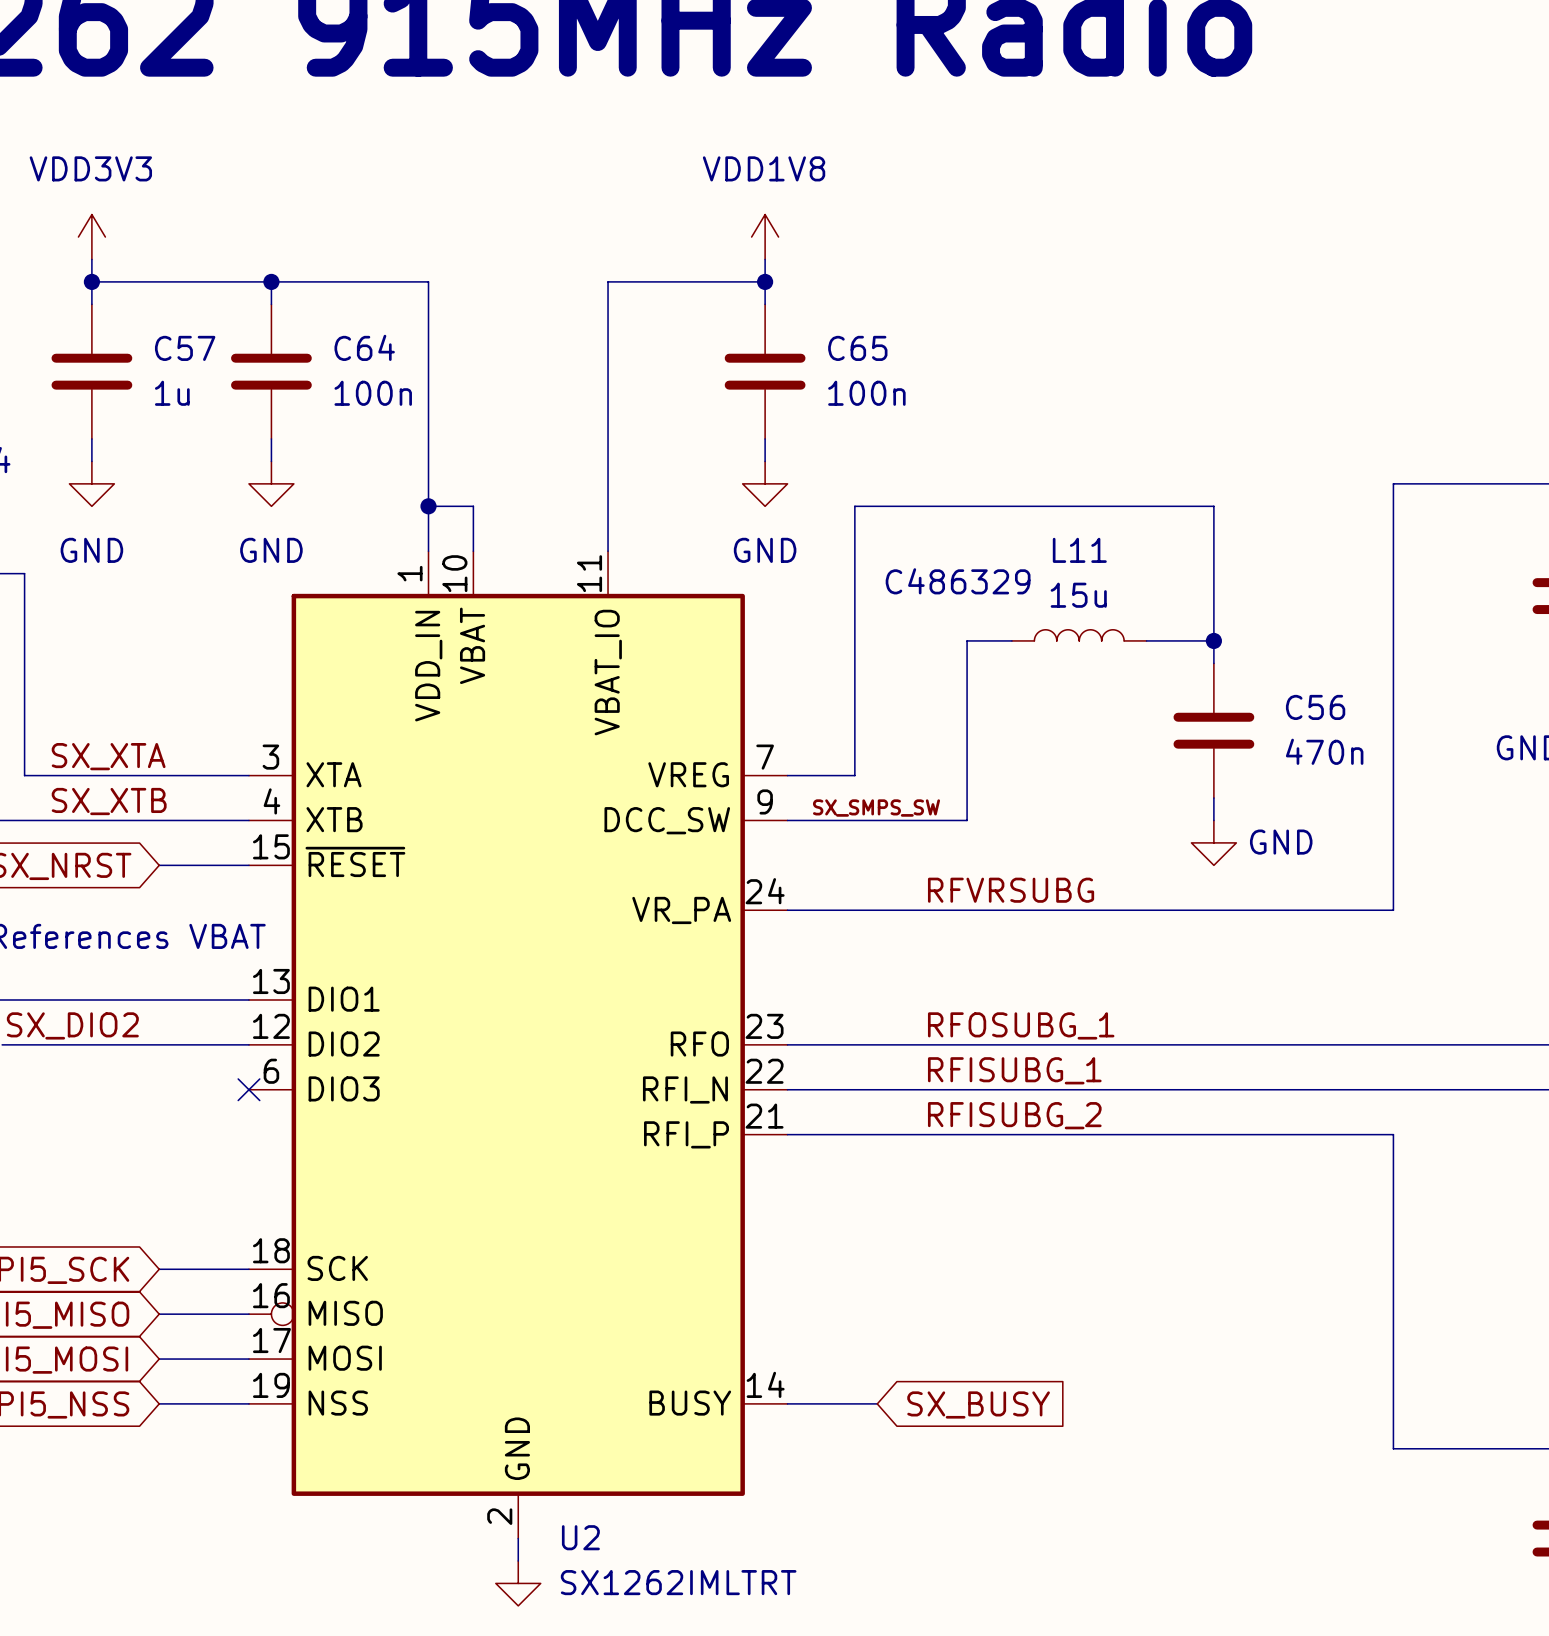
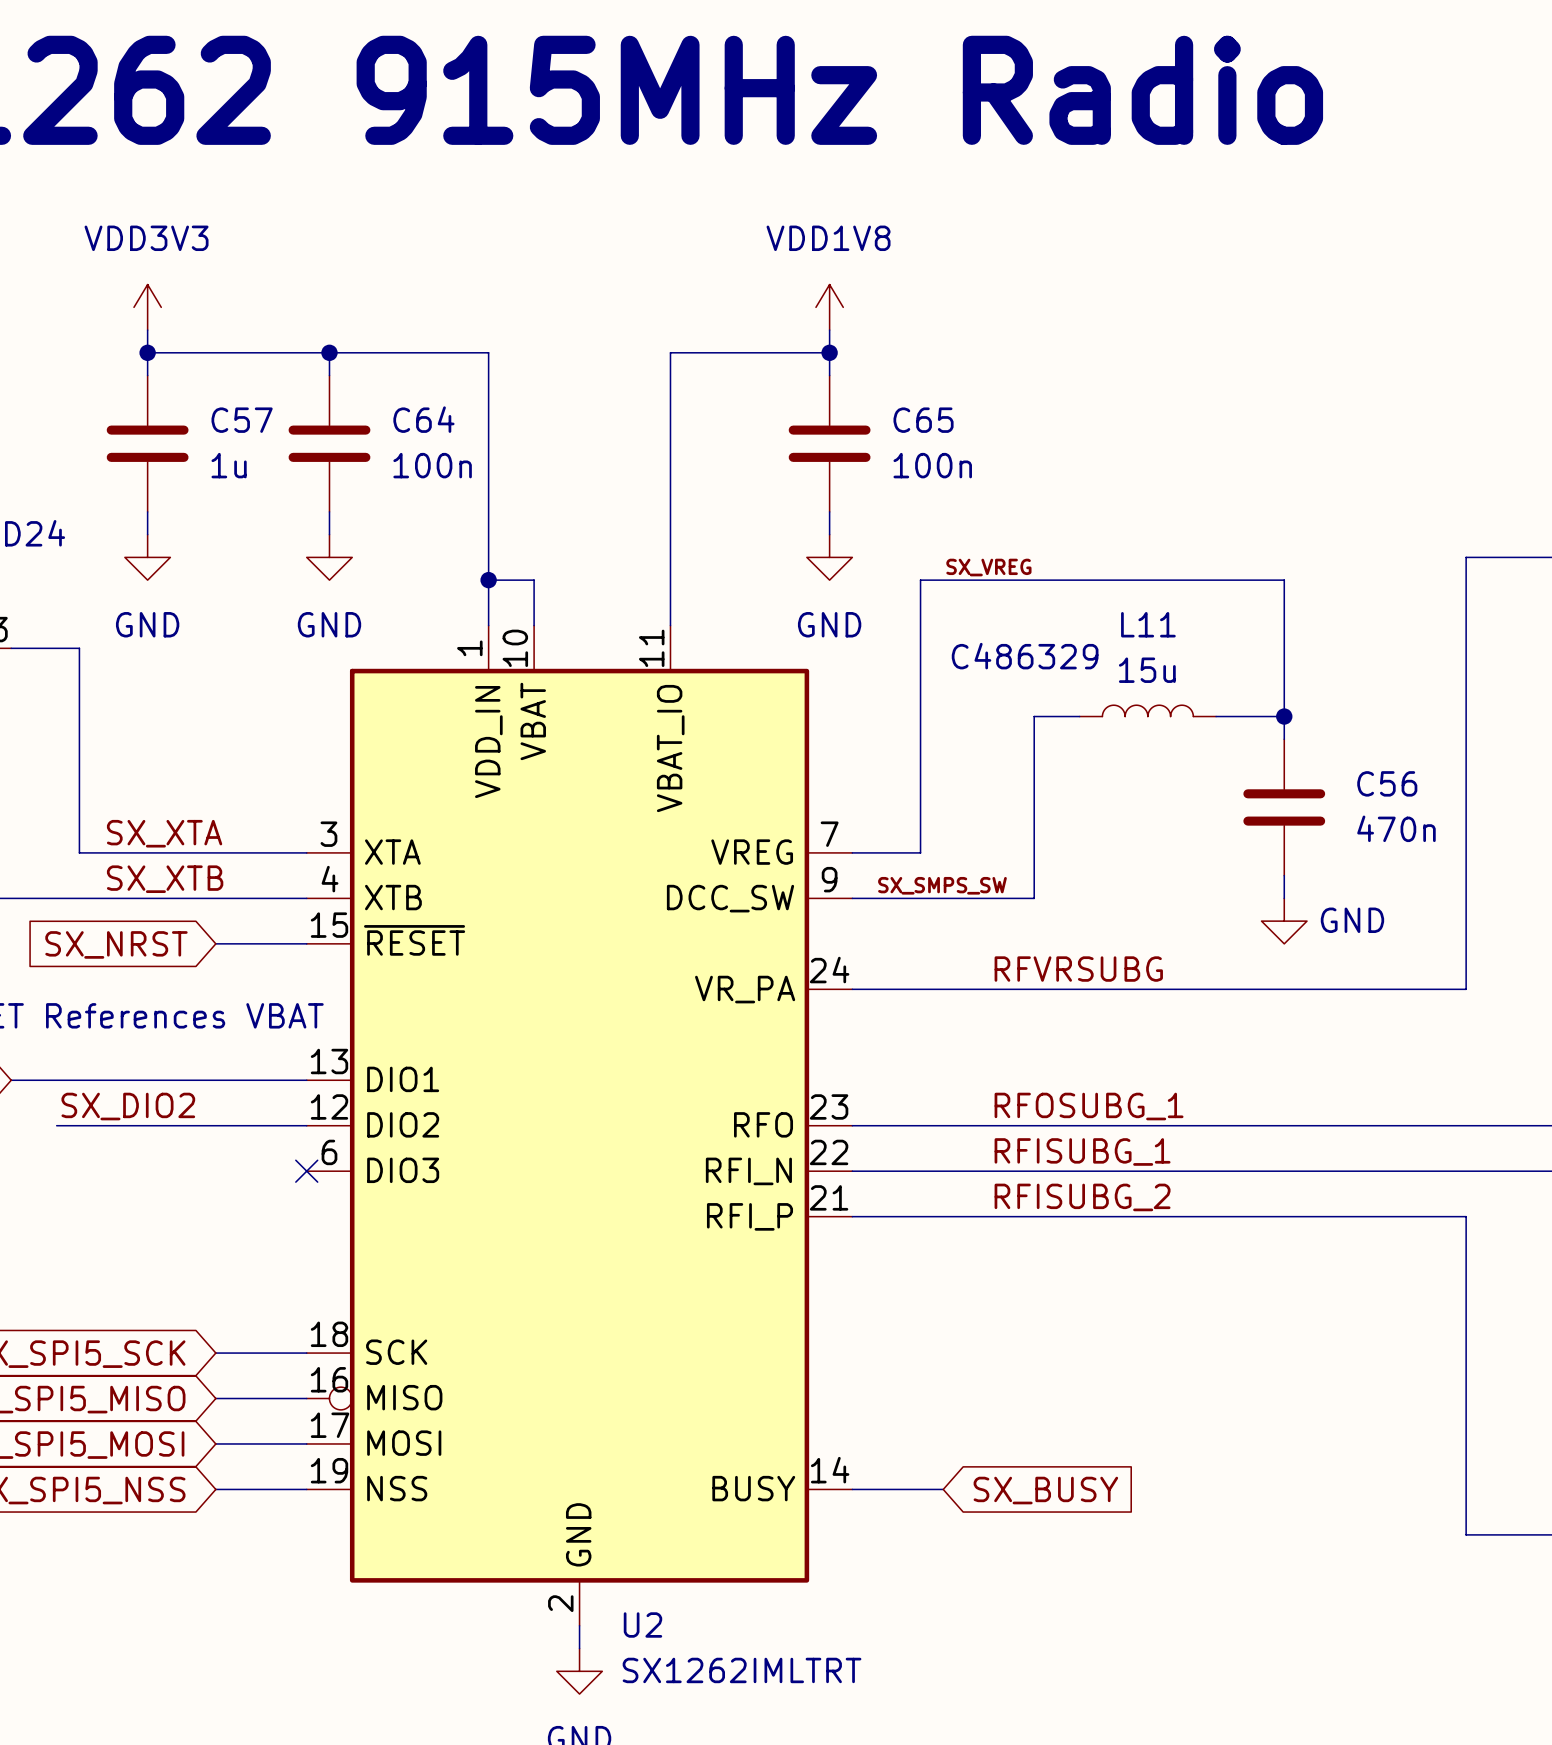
label: none -> SX_VREG (988, 567)

